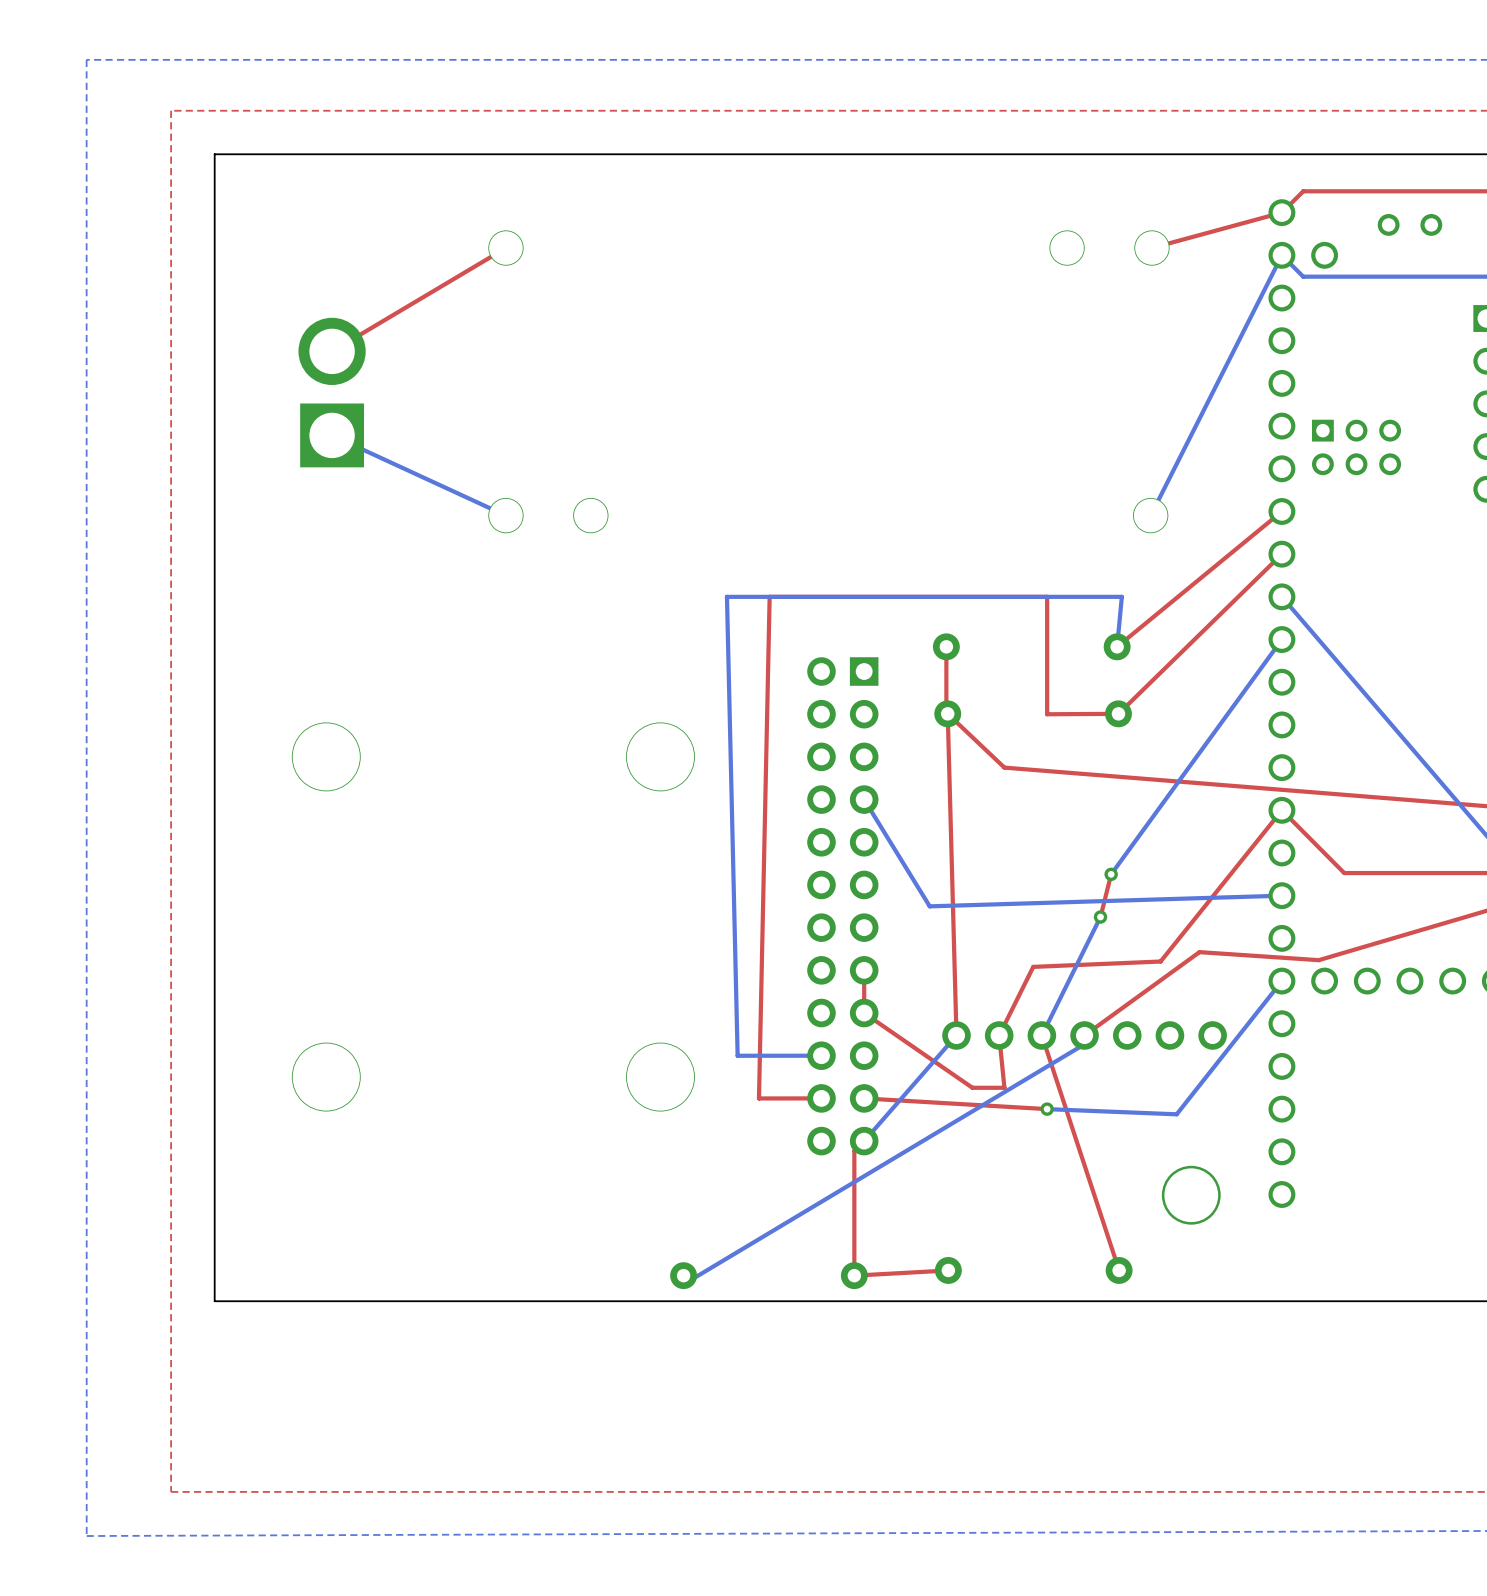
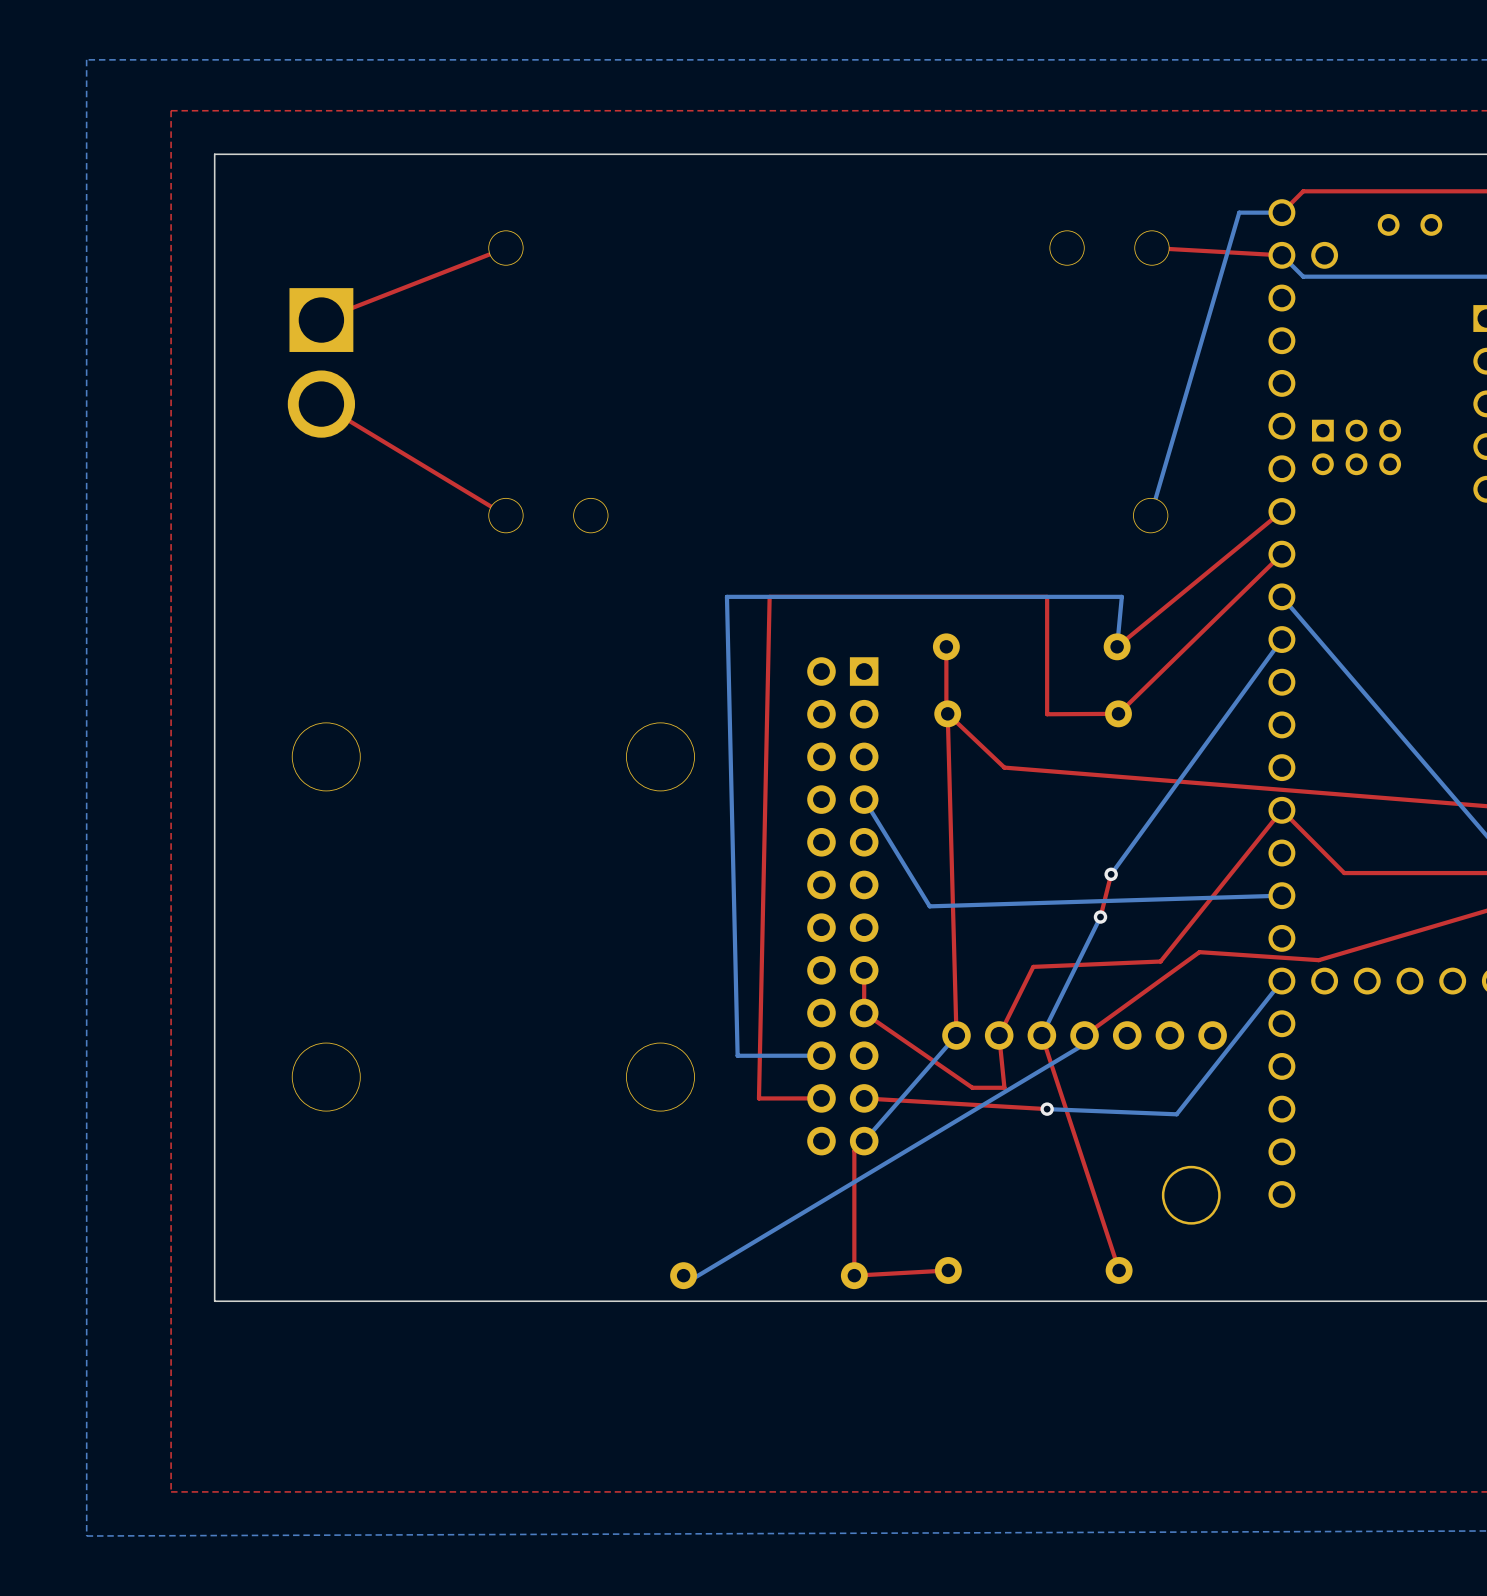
top track: (1281, 212) (1151, 248) -> (1281, 255) (1151, 248)
top track: (505, 248) (332, 351) -> (505, 248) (321, 320)
bottom track: (1281, 255) (1150, 515) -> (1281, 212) (1239, 212) (1150, 515)
part rotation: 0° (332, 392) -> 180° (321, 362)
top track: none -> (321, 404) (505, 515)
bottom track: (332, 435) (505, 515) -> none

